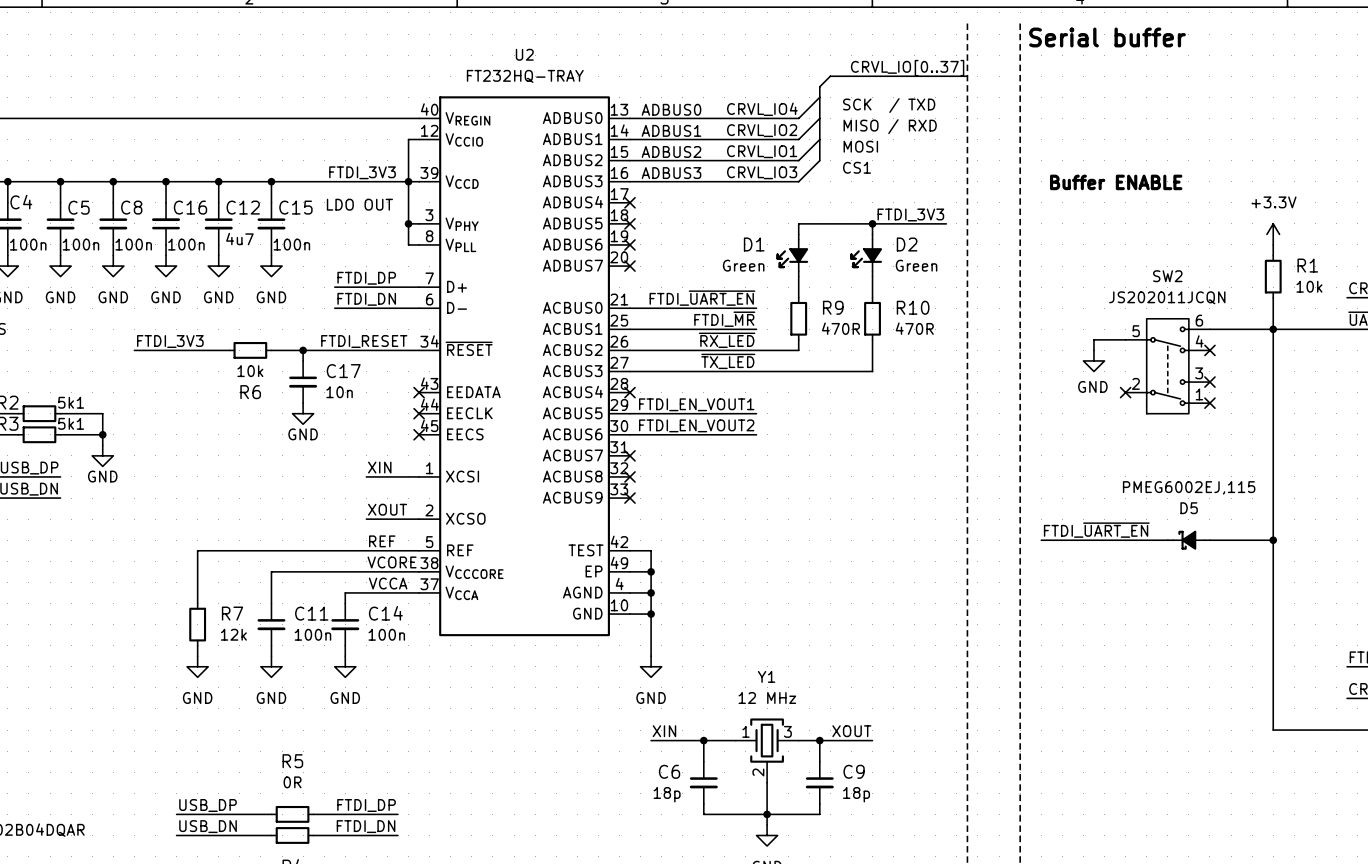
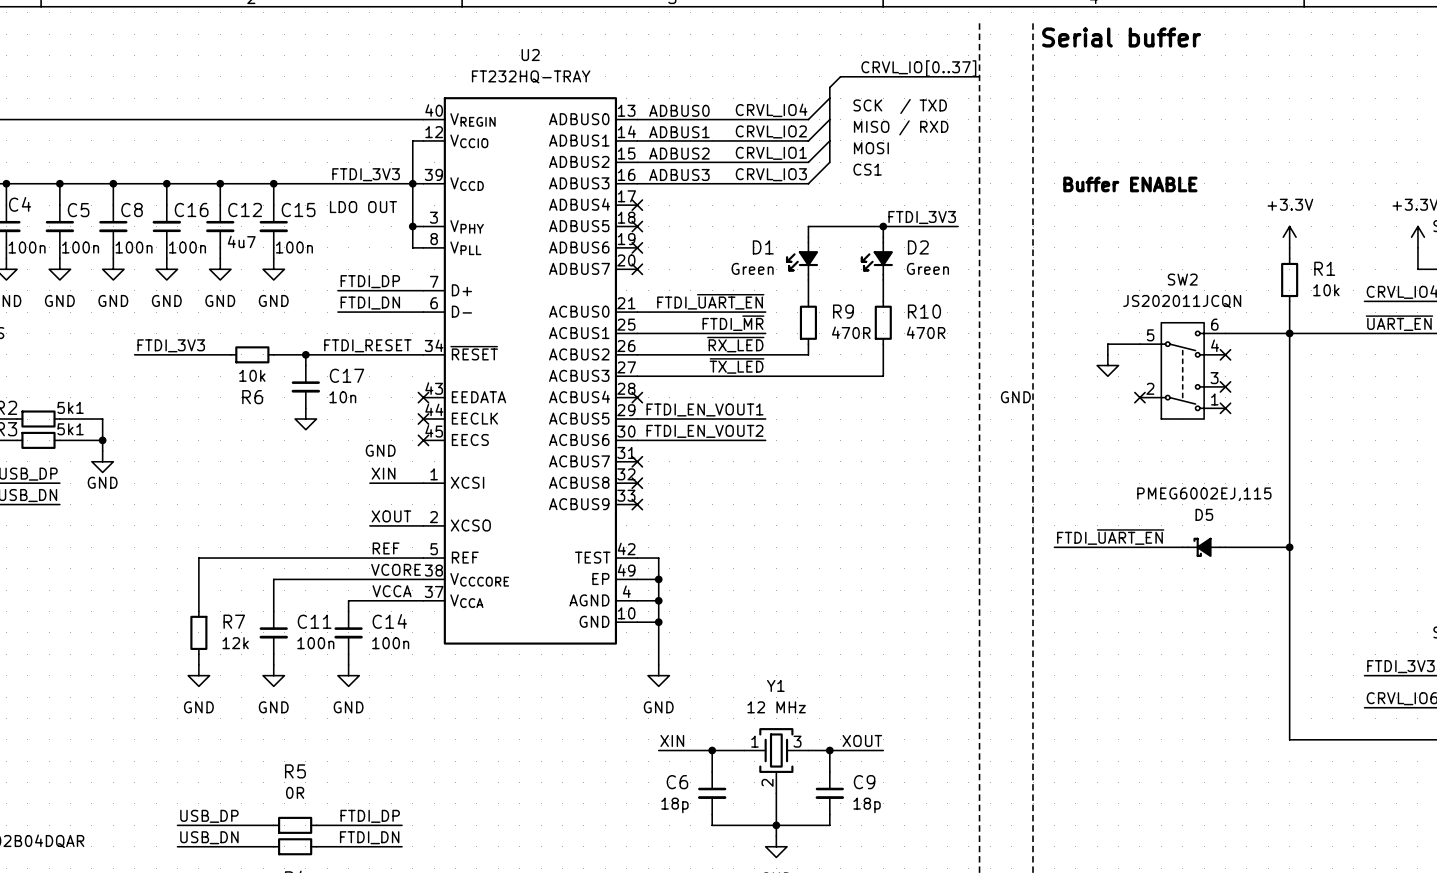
power symbol text position: GND (1092, 386) -> GND (1015, 397)
power symbol text position: GND (303, 434) -> GND (380, 450)

